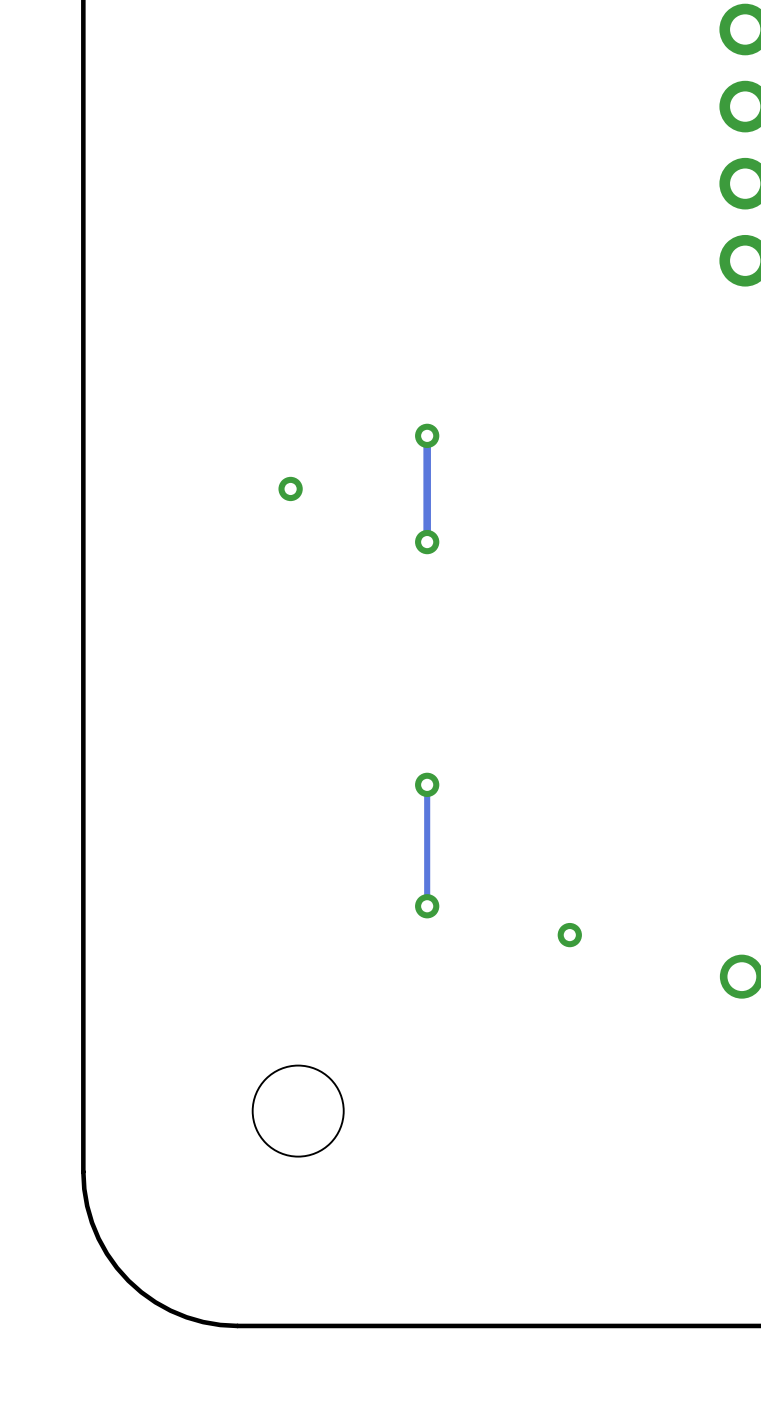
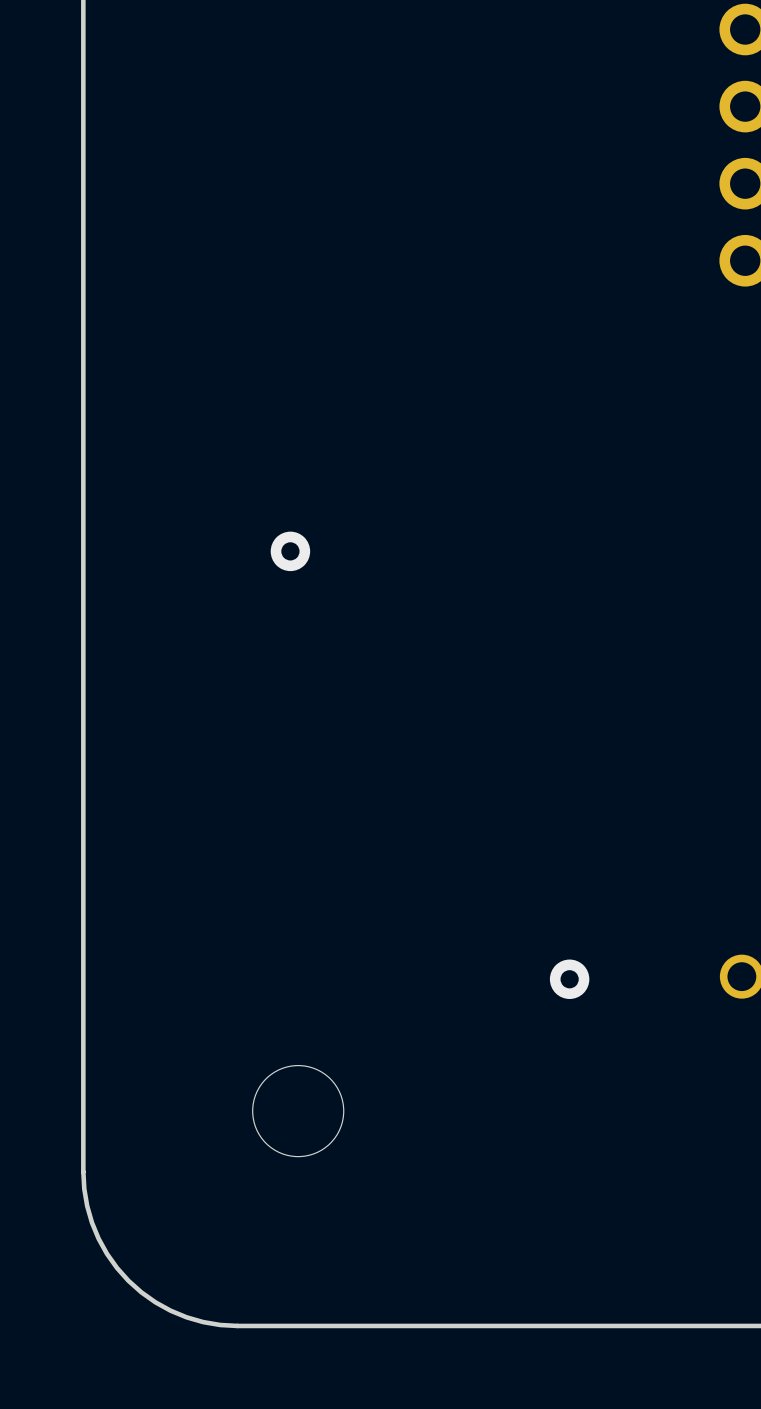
track: (427, 435) (427, 542) -> none
via: (427, 435) -> none
via: (290, 488) -> none
via: (427, 542) -> none
via: none -> (290, 551)
track: (427, 784) (427, 906) -> none
via: (427, 784) -> none
via: (427, 906) -> none
via: (569, 935) -> none
via: none -> (569, 979)

